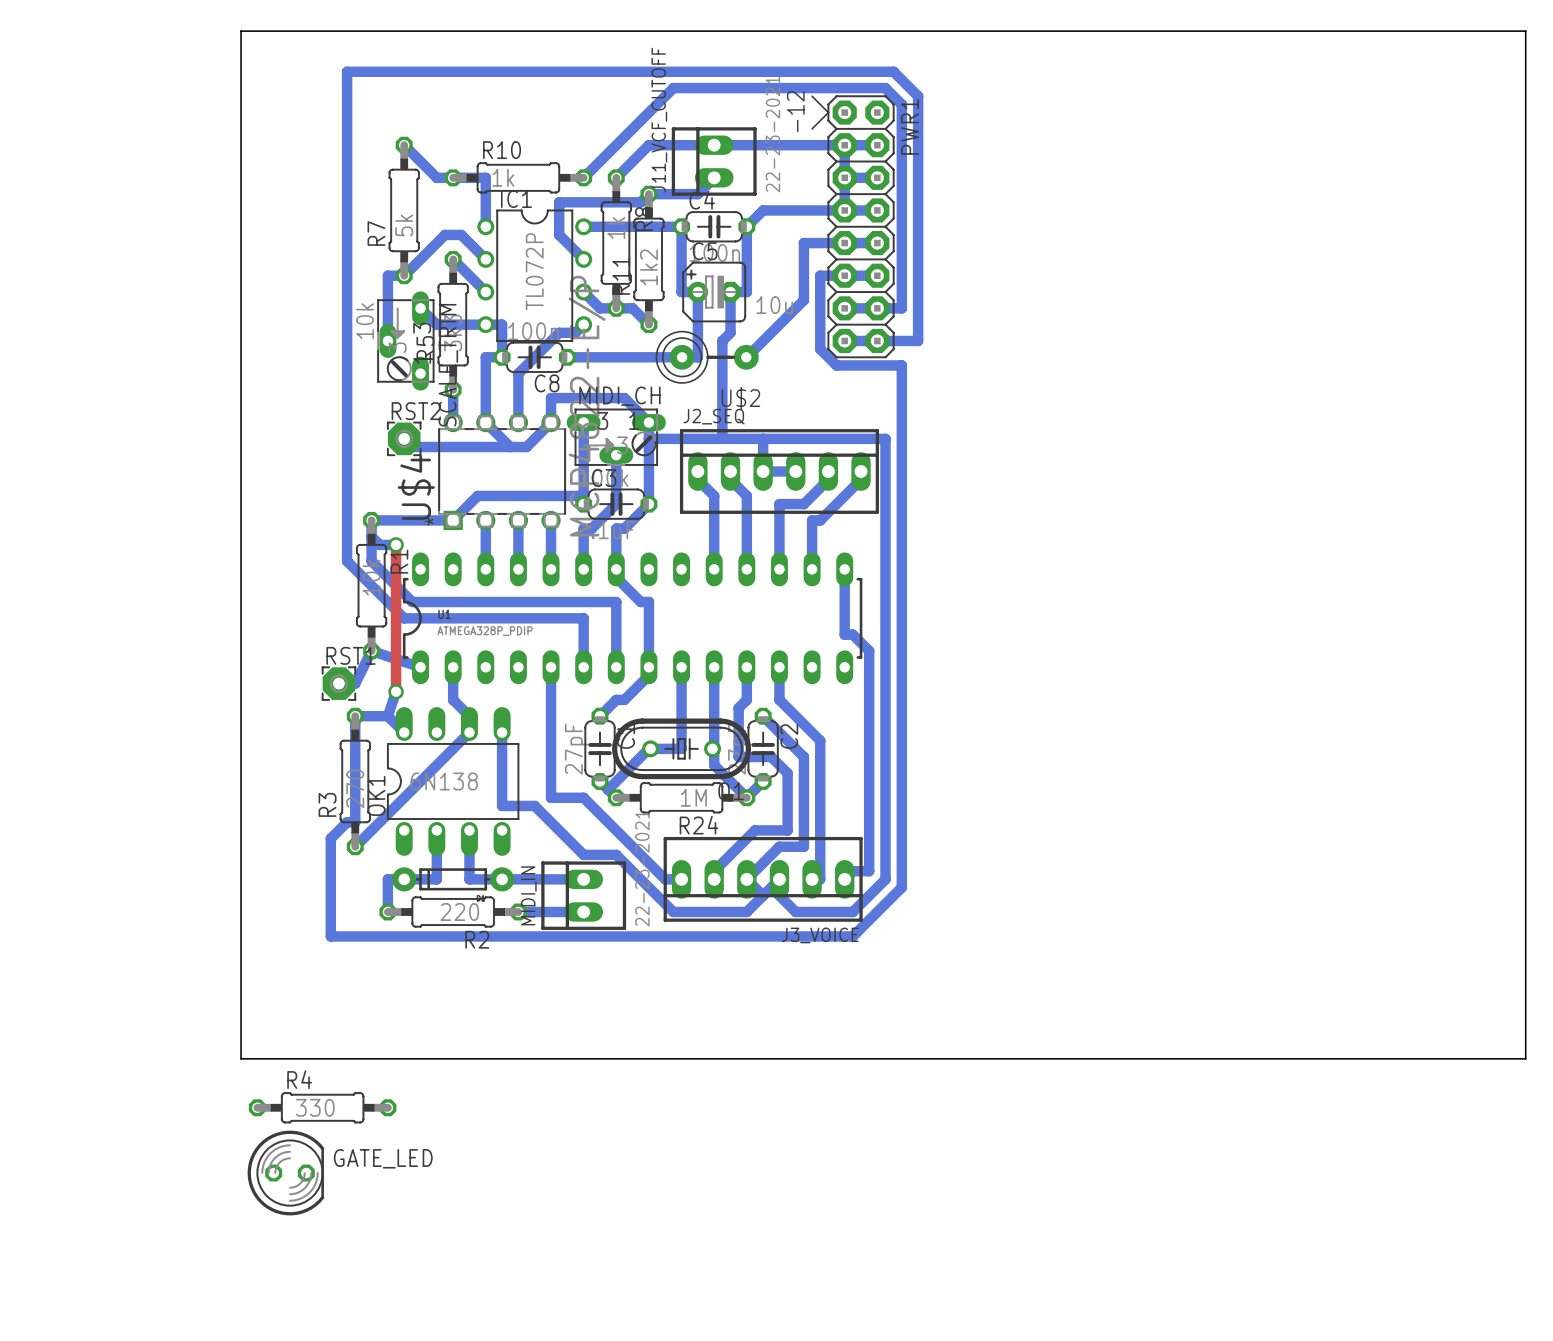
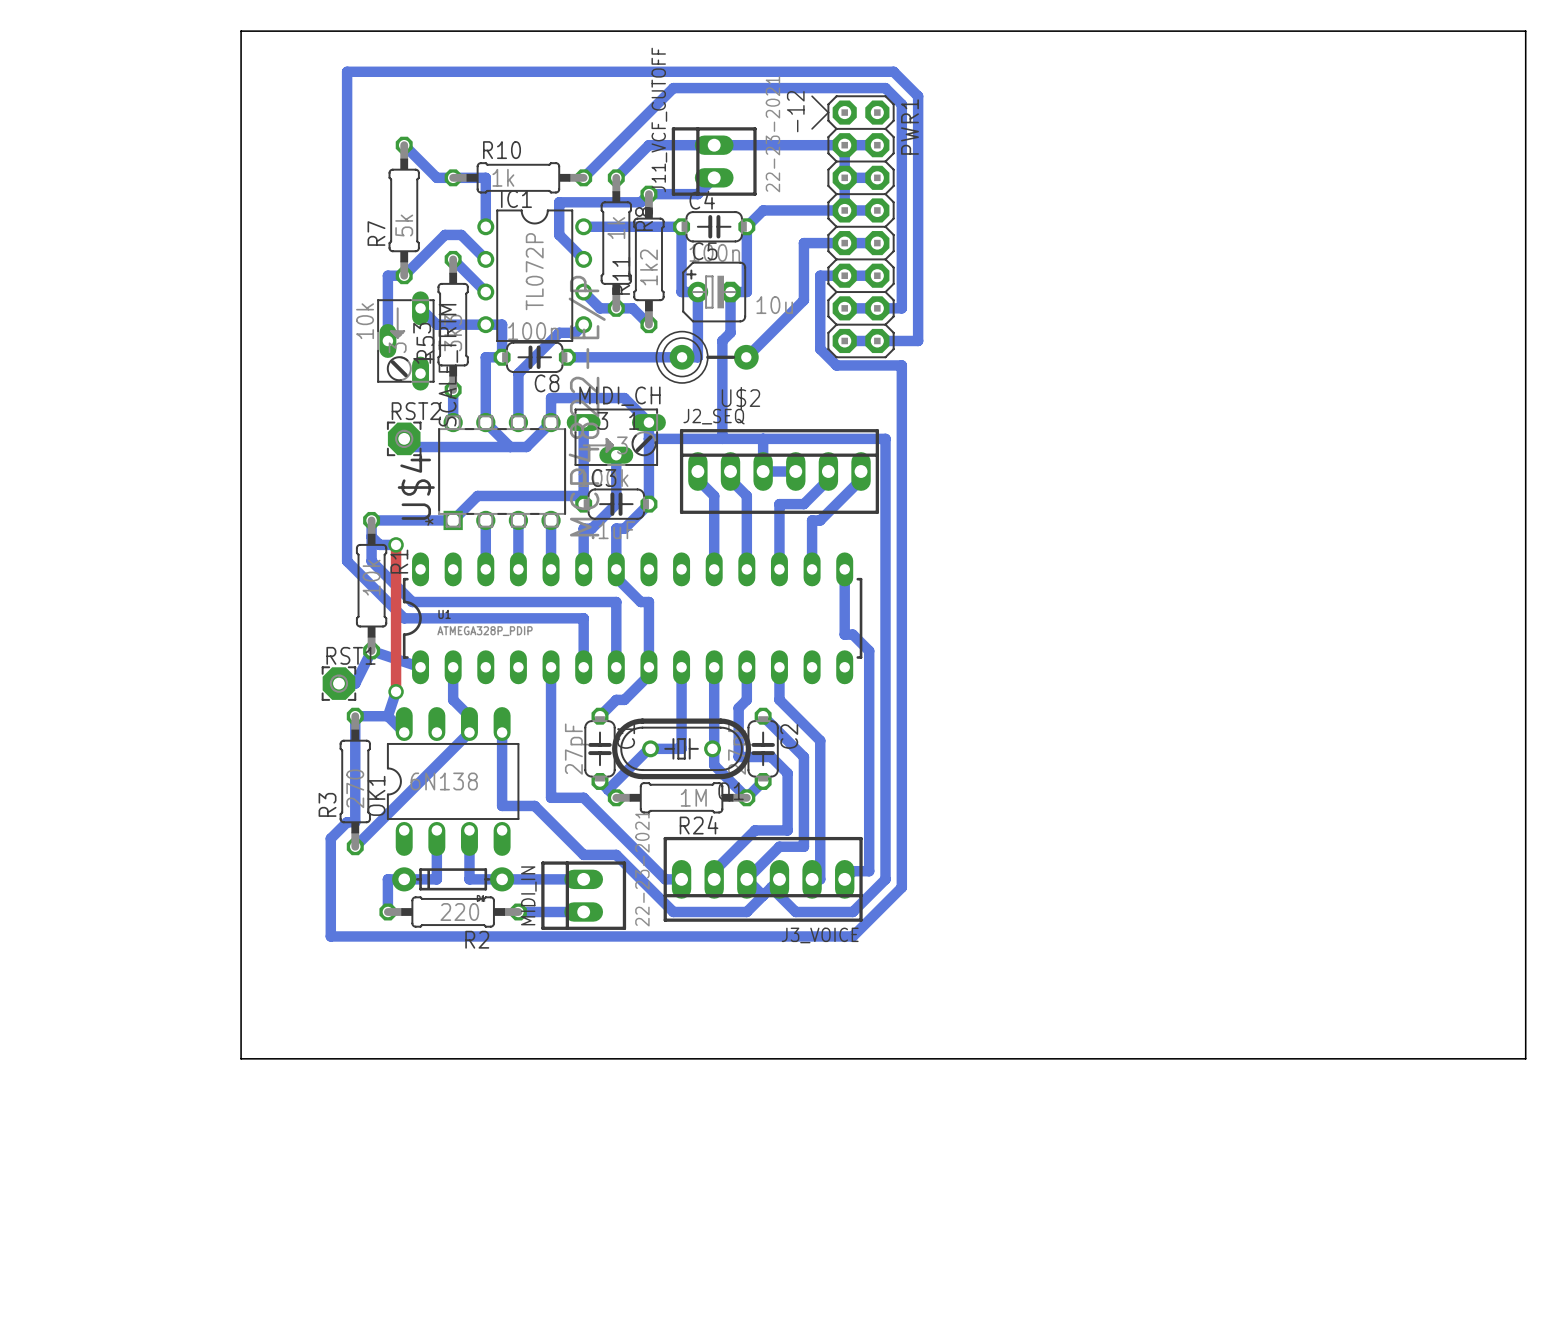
R4: 330 (322, 1107) -> none
GATE_LED: (285, 1173) -> none

